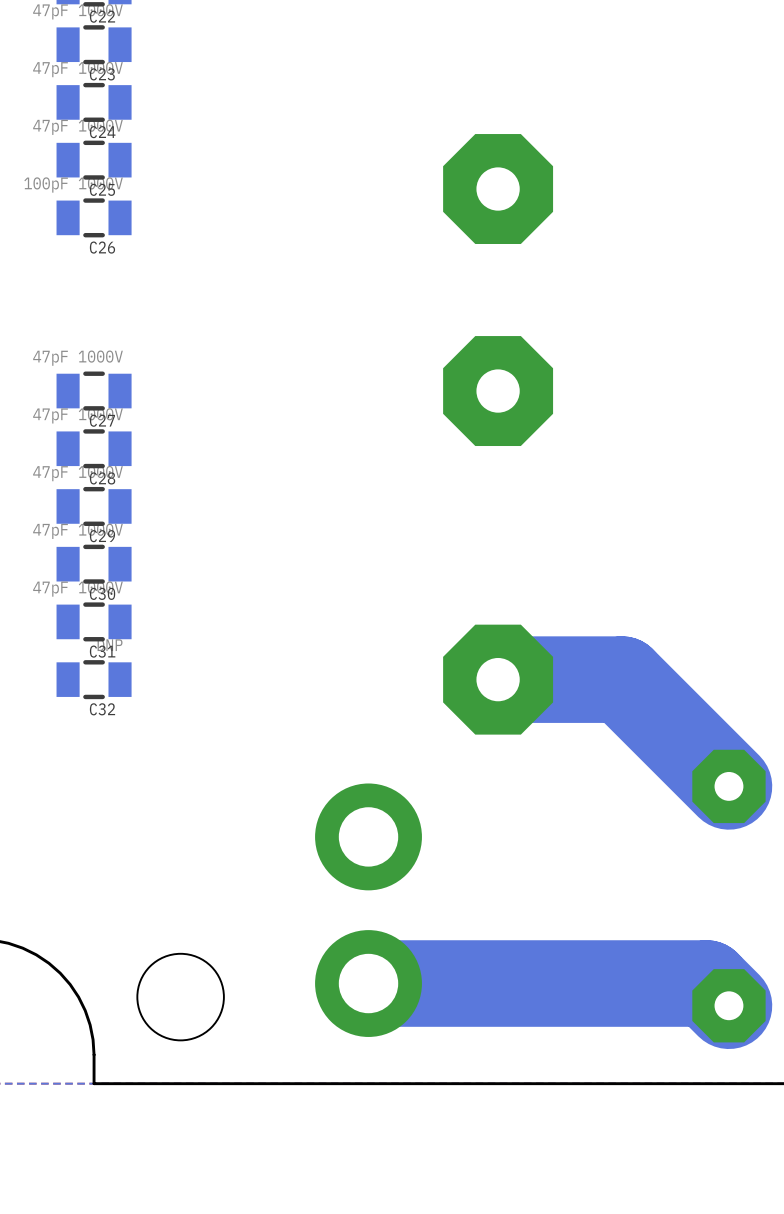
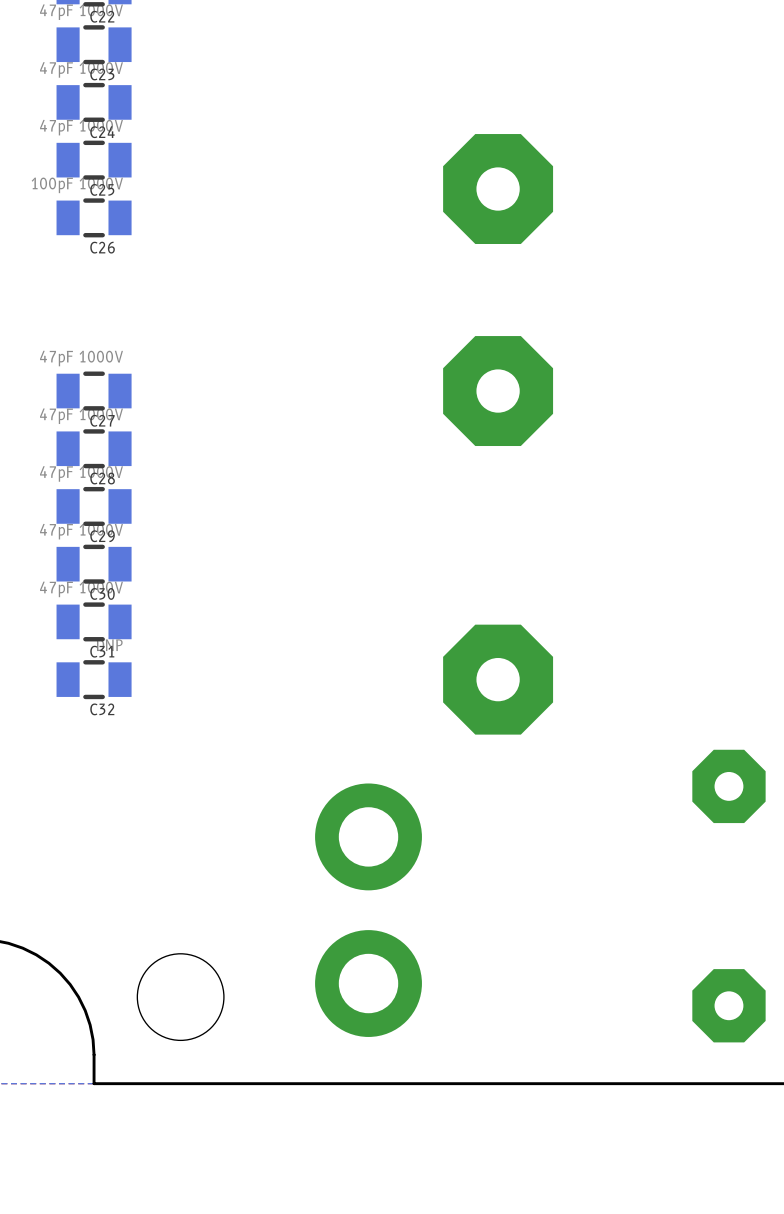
bottom track: (498, 679) (622, 679) (728, 786) -> none
bottom track: (368, 983) (706, 983) (728, 1005) -> none

